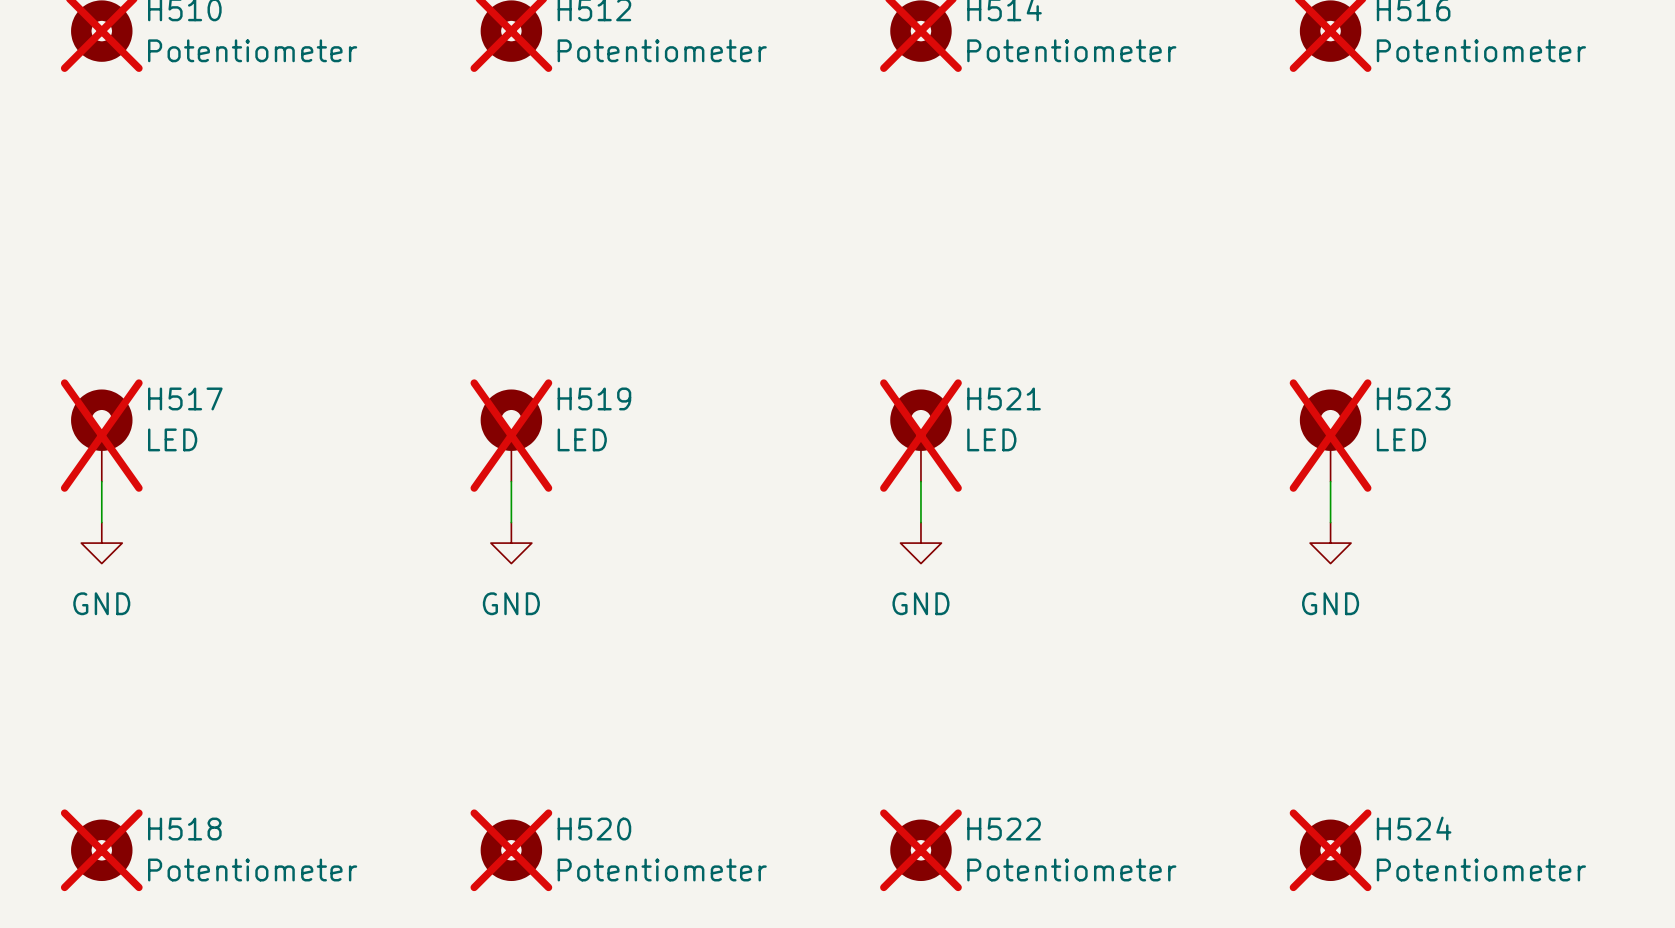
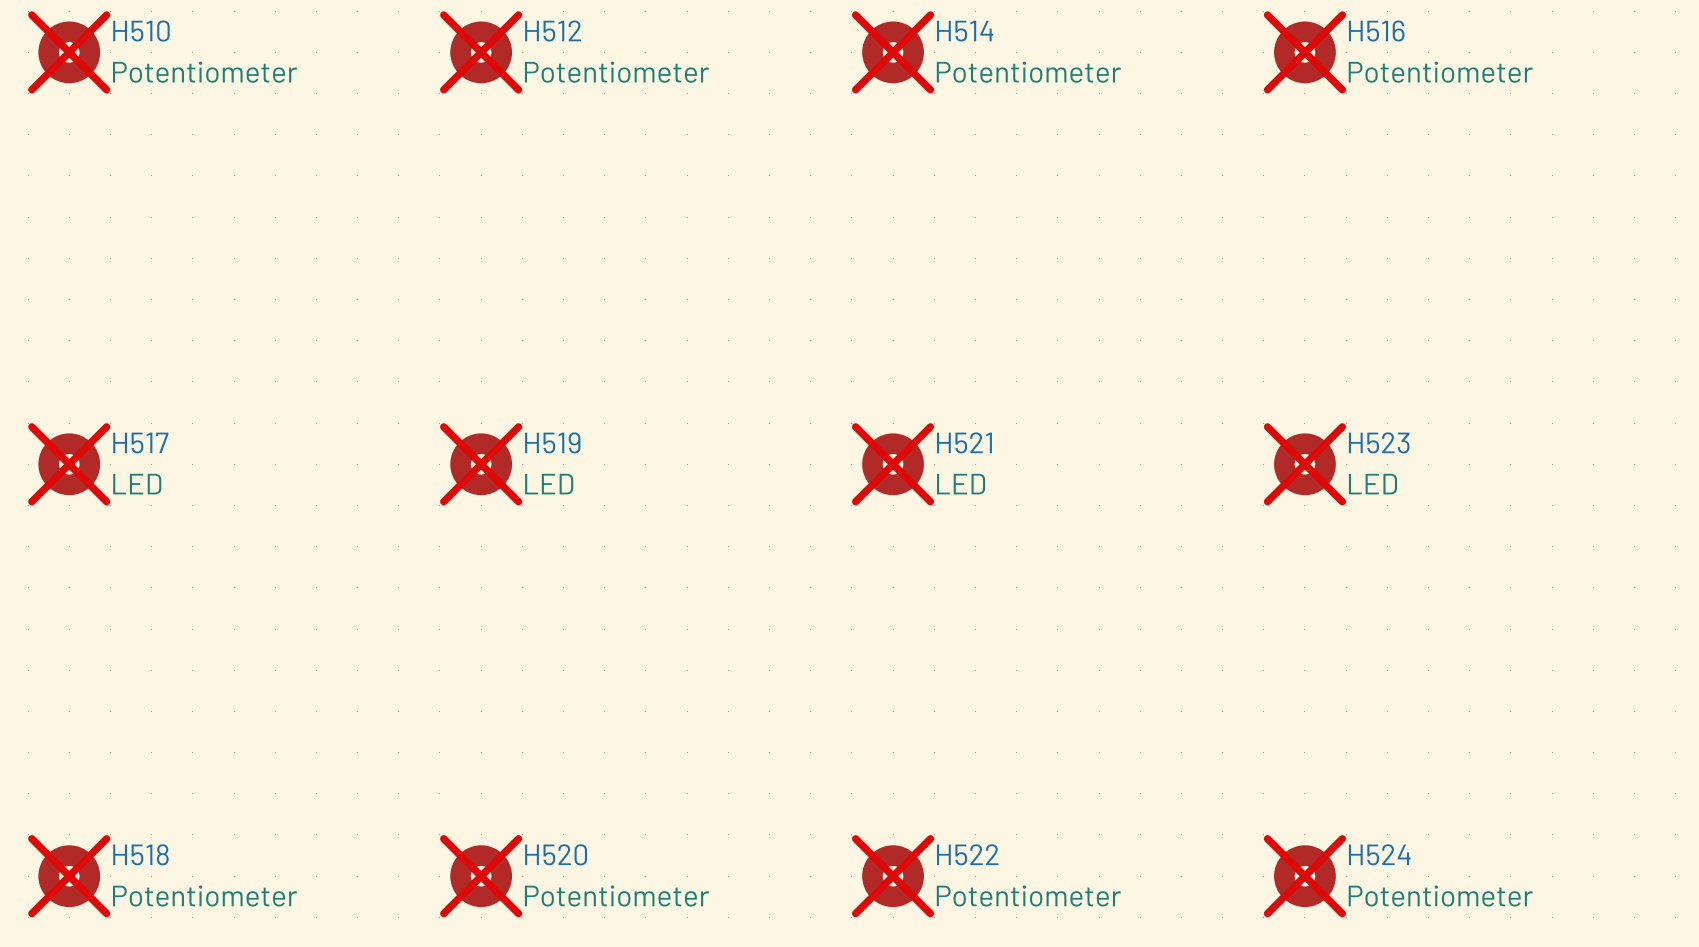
H517 symbol: [71, 389, 133, 482] -> [38, 433, 101, 496]
H519 symbol: [480, 389, 543, 482] -> [450, 433, 513, 496]
H521 symbol: [890, 389, 952, 482] -> [862, 433, 924, 496]
H523 symbol: [1299, 389, 1362, 482] -> [1274, 433, 1336, 496]
wire: (101, 481) (101, 522) -> none
wire: (511, 481) (511, 522) -> none
wire: (920, 481) (920, 522) -> none
wire: (1330, 481) (1330, 522) -> none
power symbol: GND (101, 543) -> none
power symbol: GND (511, 543) -> none
power symbol: GND (920, 543) -> none
power symbol: GND (1330, 543) -> none

